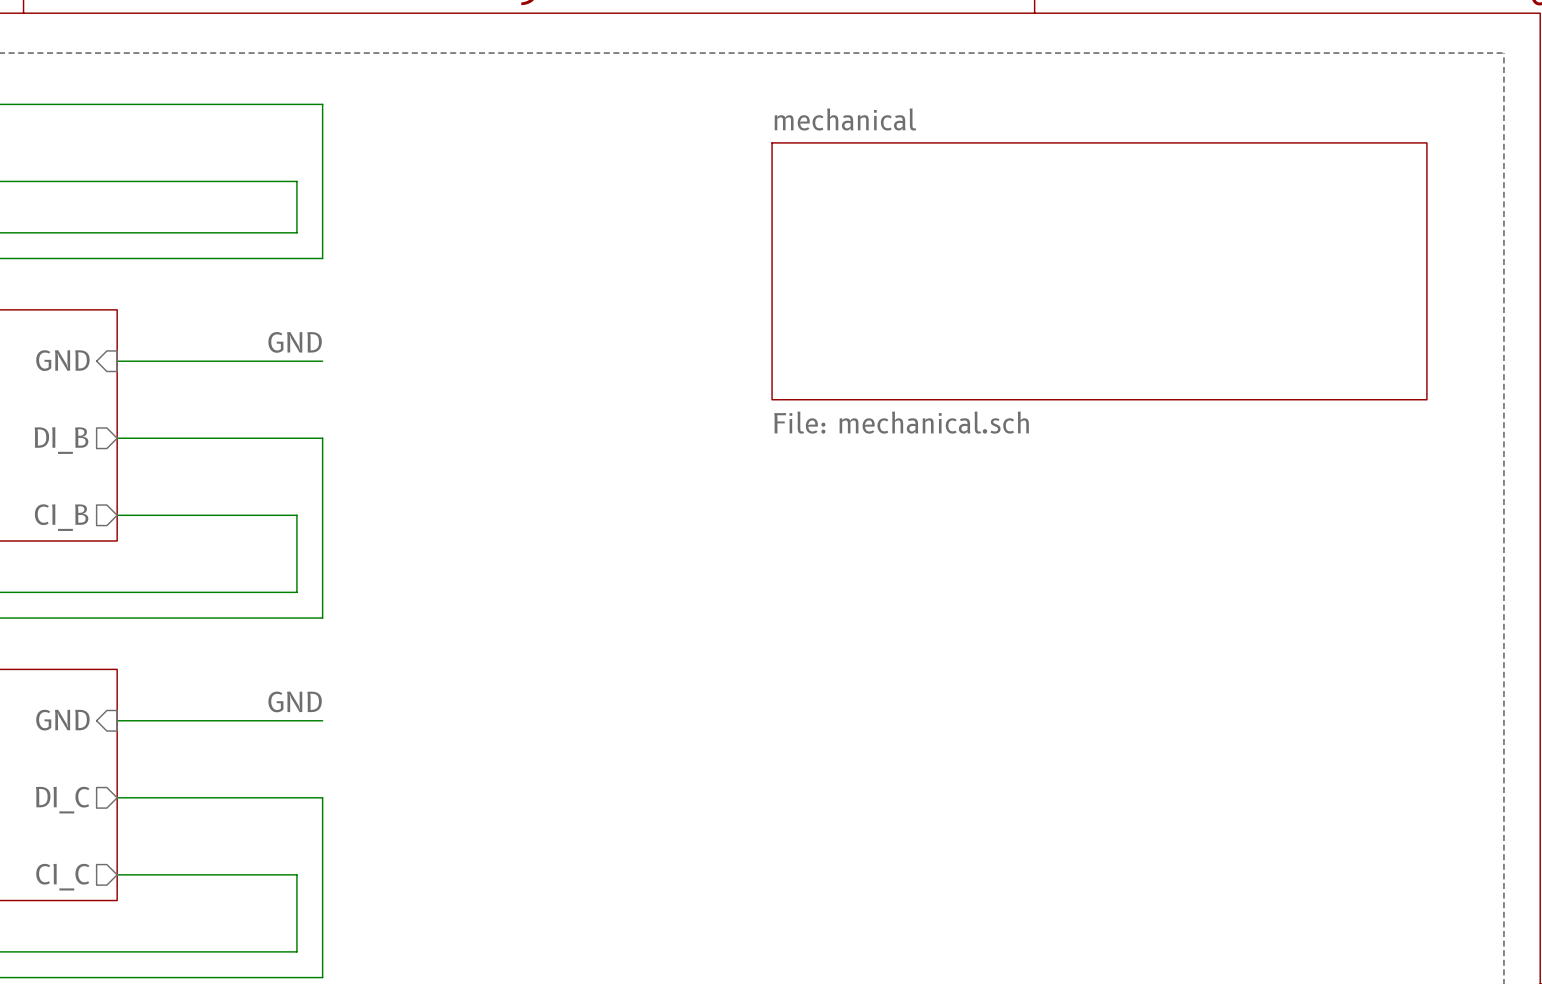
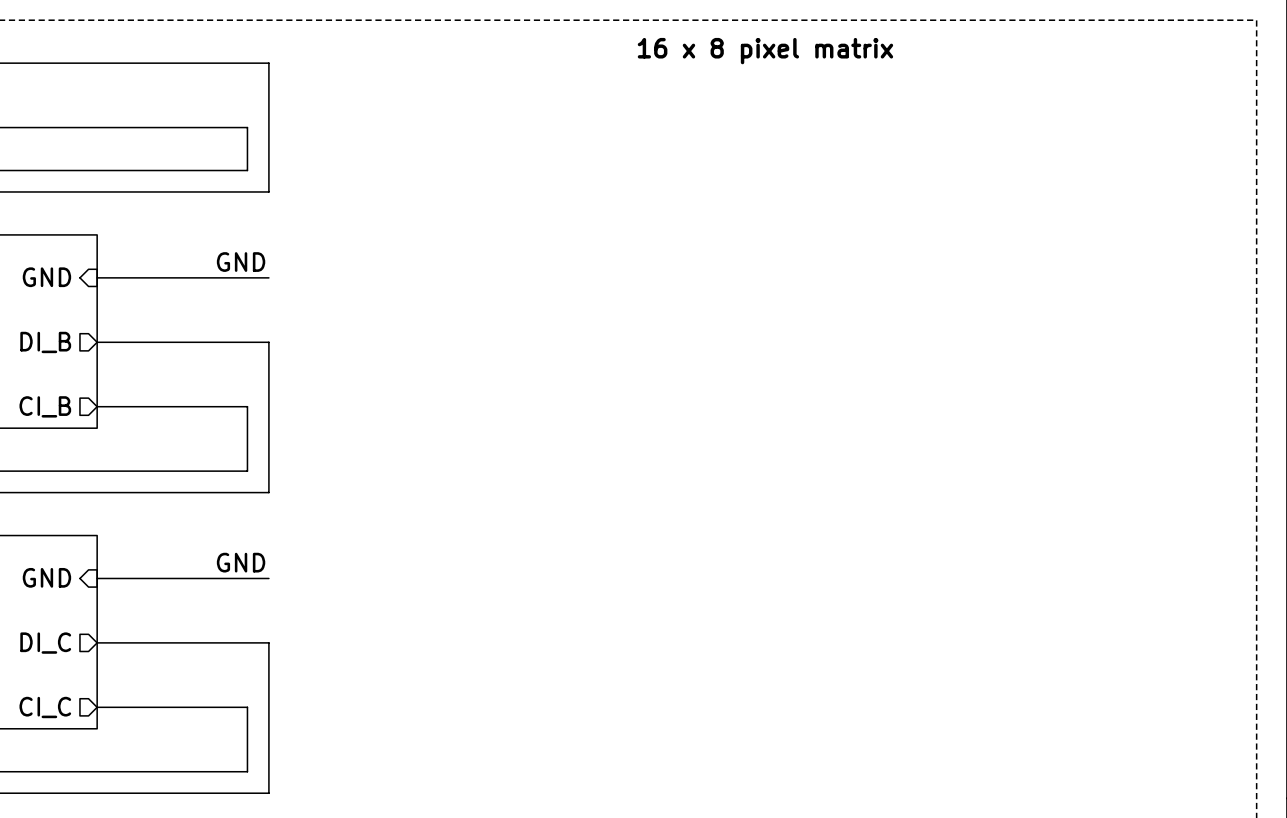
text: none -> 16 x 8 pixel matrix (765, 51)
sheet mechanical: File: mechanical.sch (1099, 271) -> none

